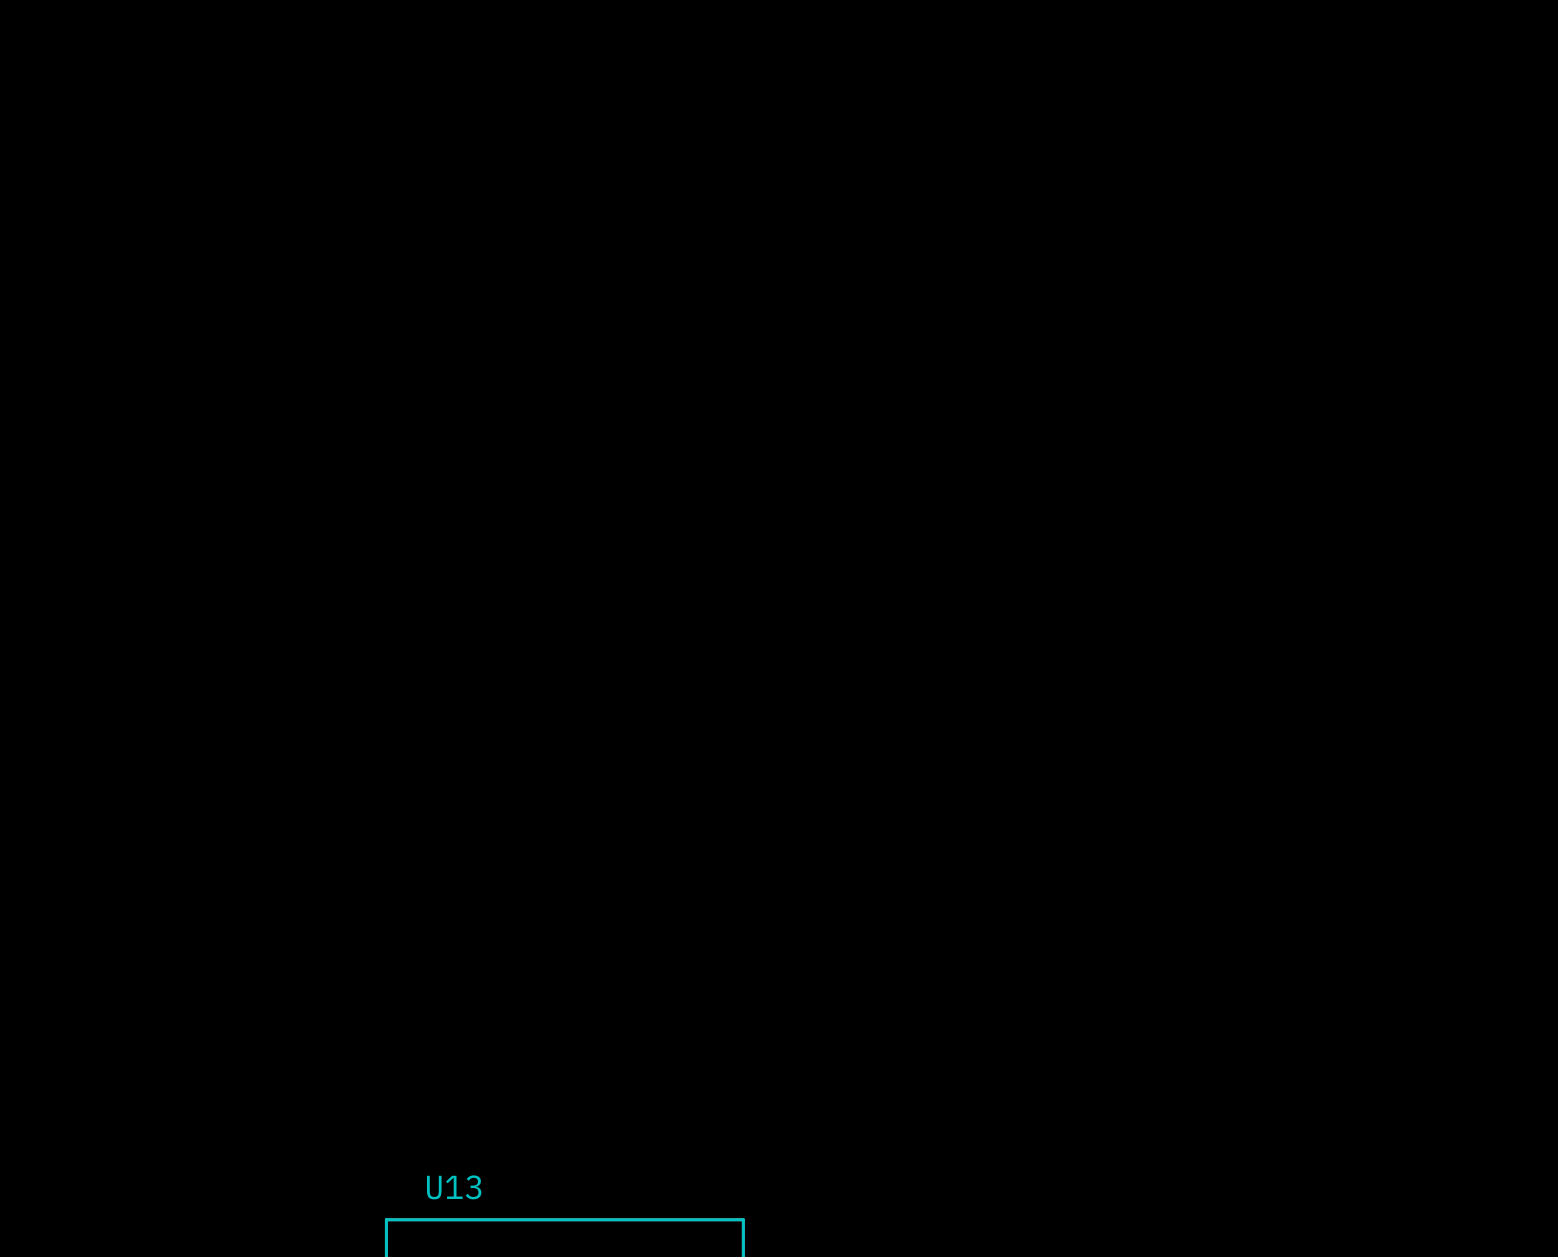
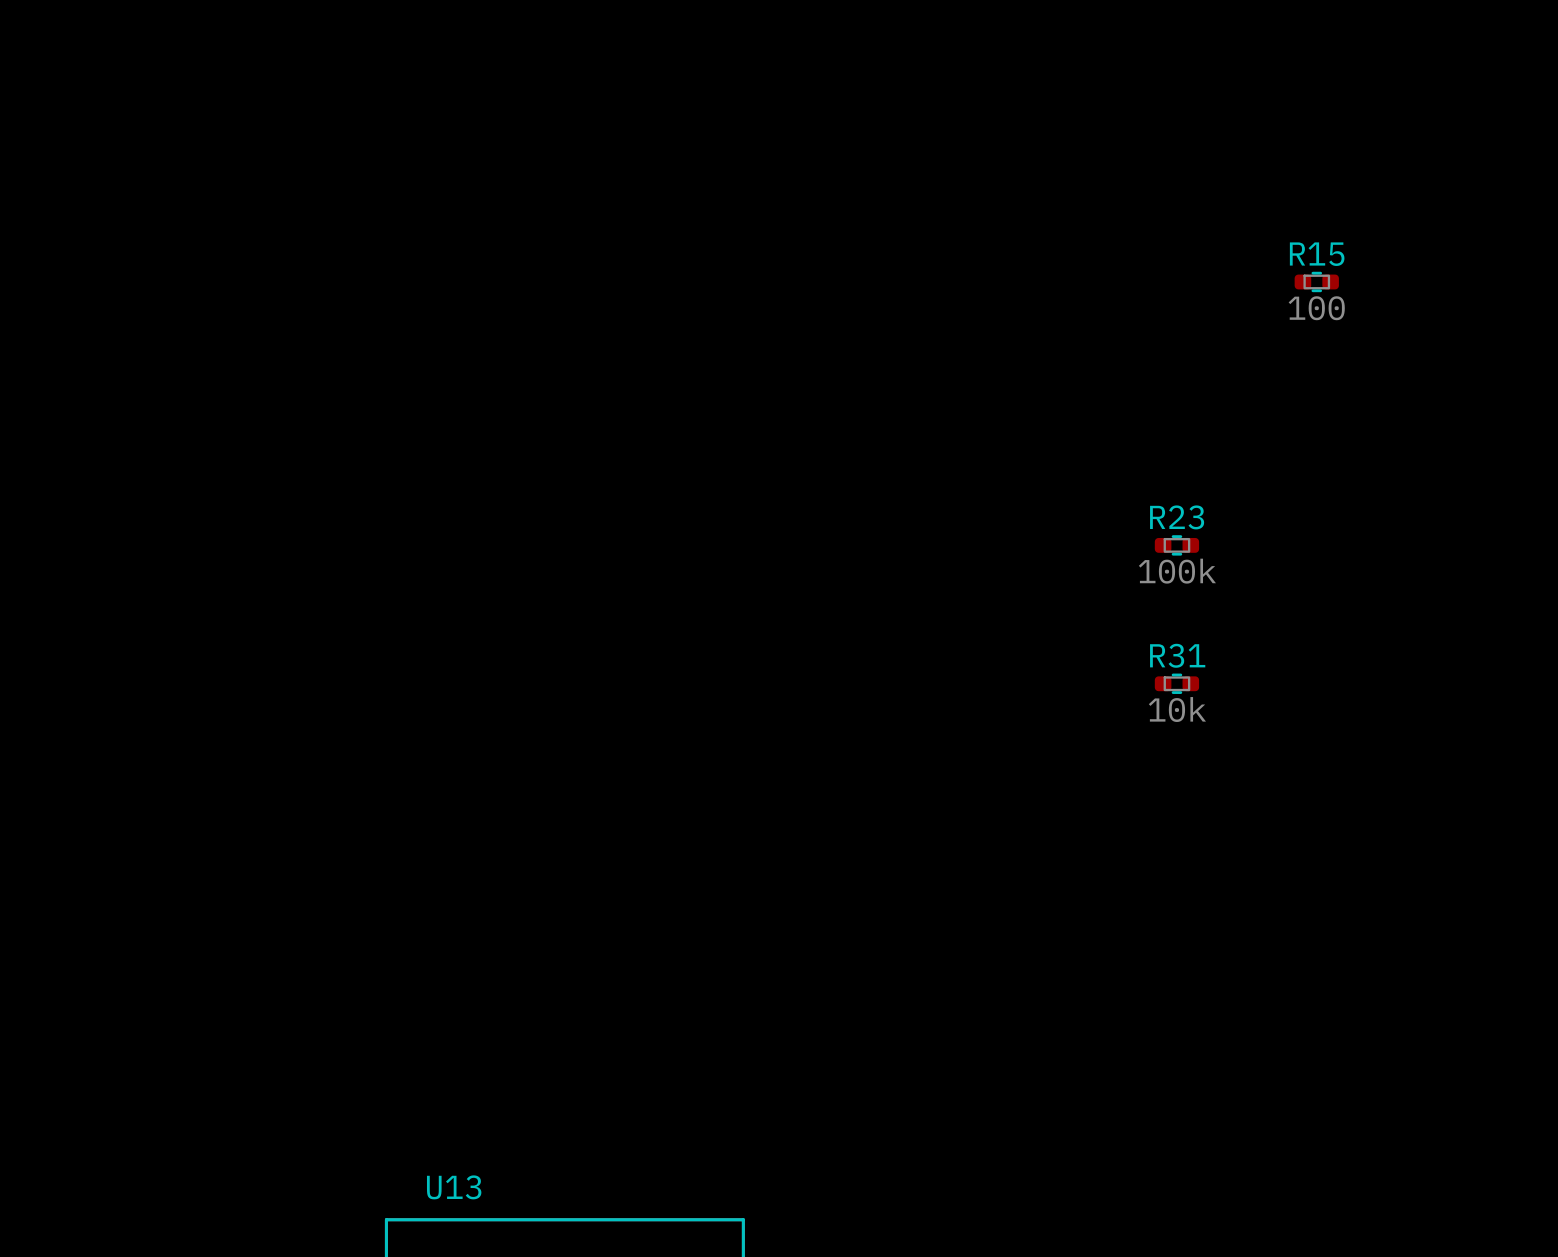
R15: none -> 100 (1316, 281)
R23: none -> 100k (1176, 545)
R31: none -> 10k (1176, 683)

